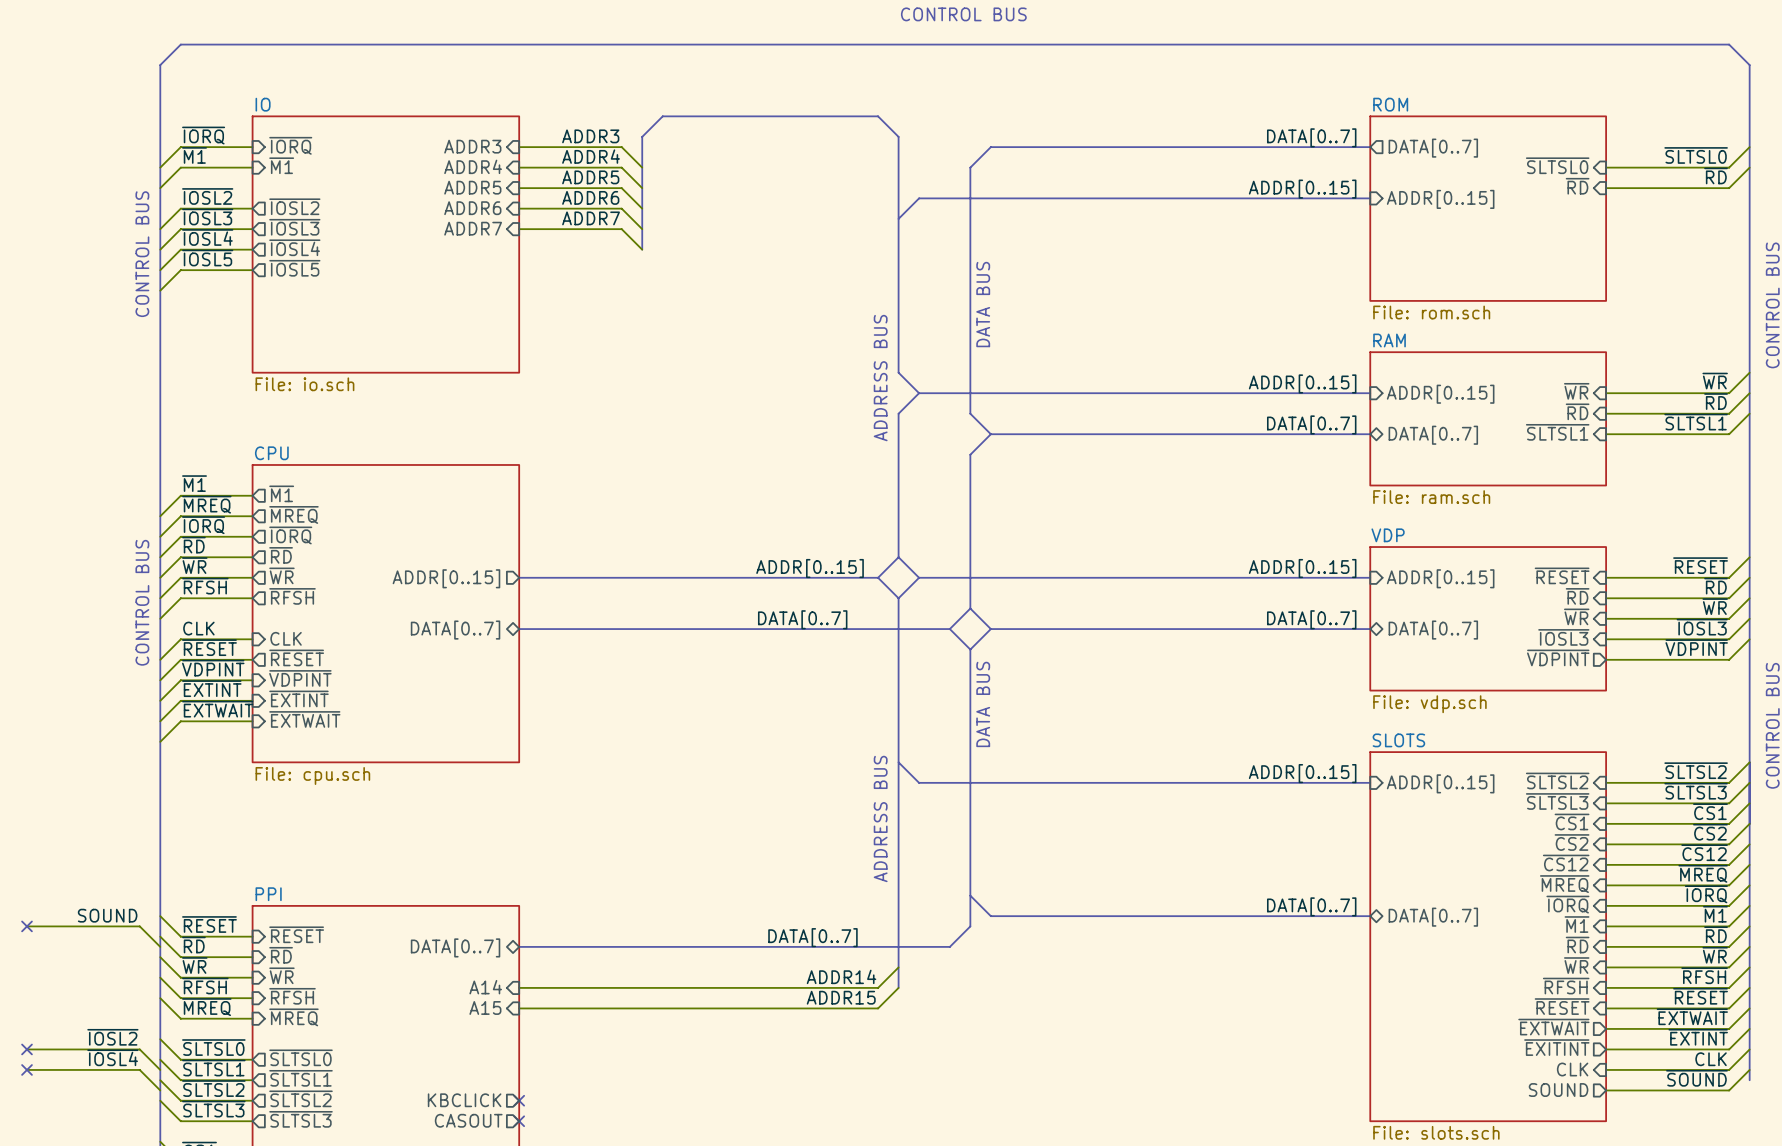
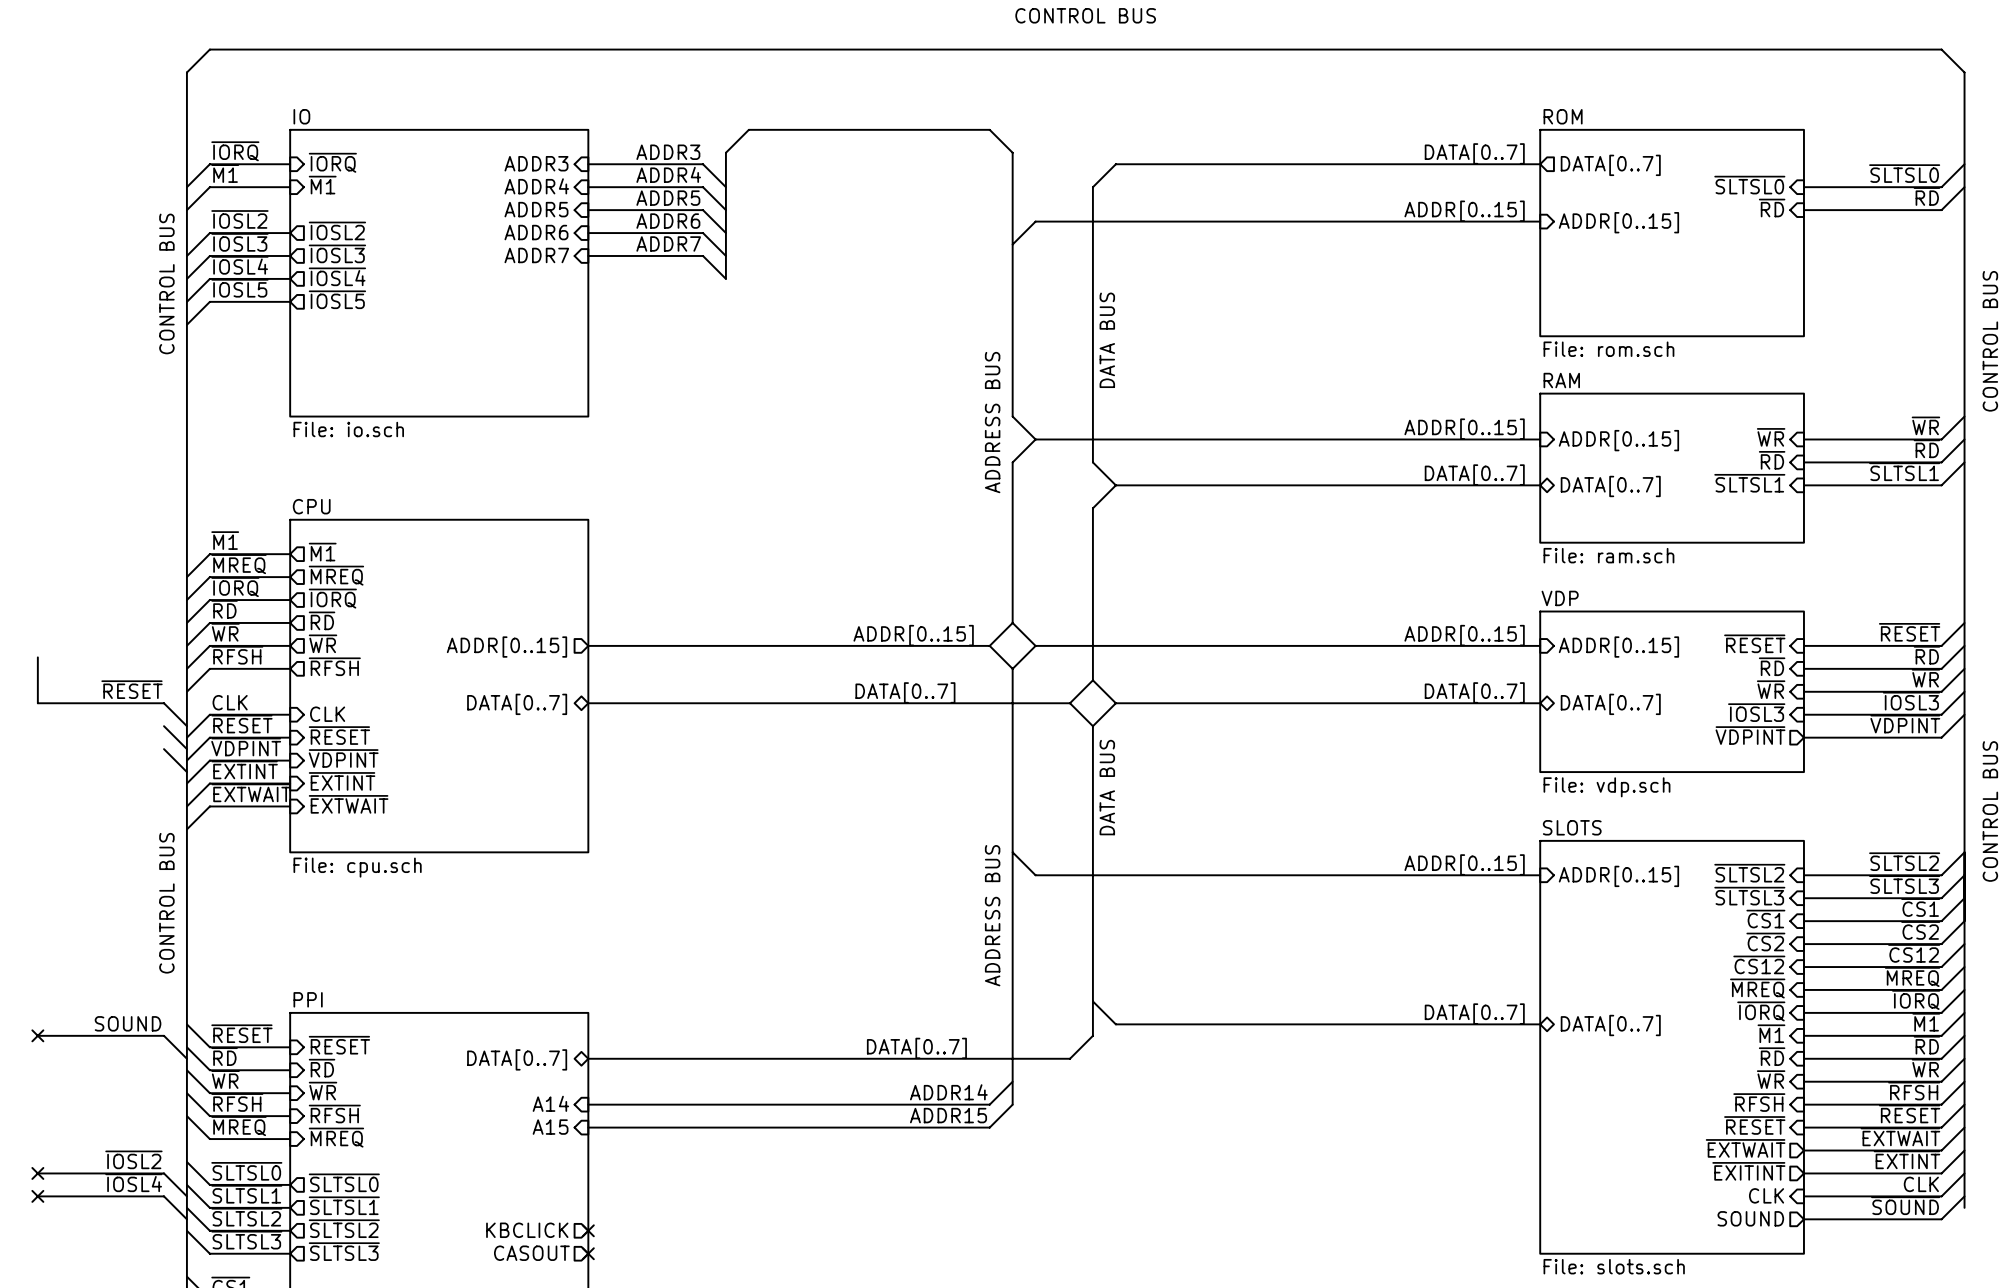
wire: none -> (37, 657) (37, 703) (164, 703) (186, 726)
text: CONTROL BUS (142, 602) -> none
label: none -> ~{RESET} (132, 689)
wire: none -> (164, 726) (186, 749)
sheet pin shape: output (296, 657) -> input (339, 735)
wire: none -> (164, 749) (186, 772)
text: none -> CONTROL BUS (166, 903)

